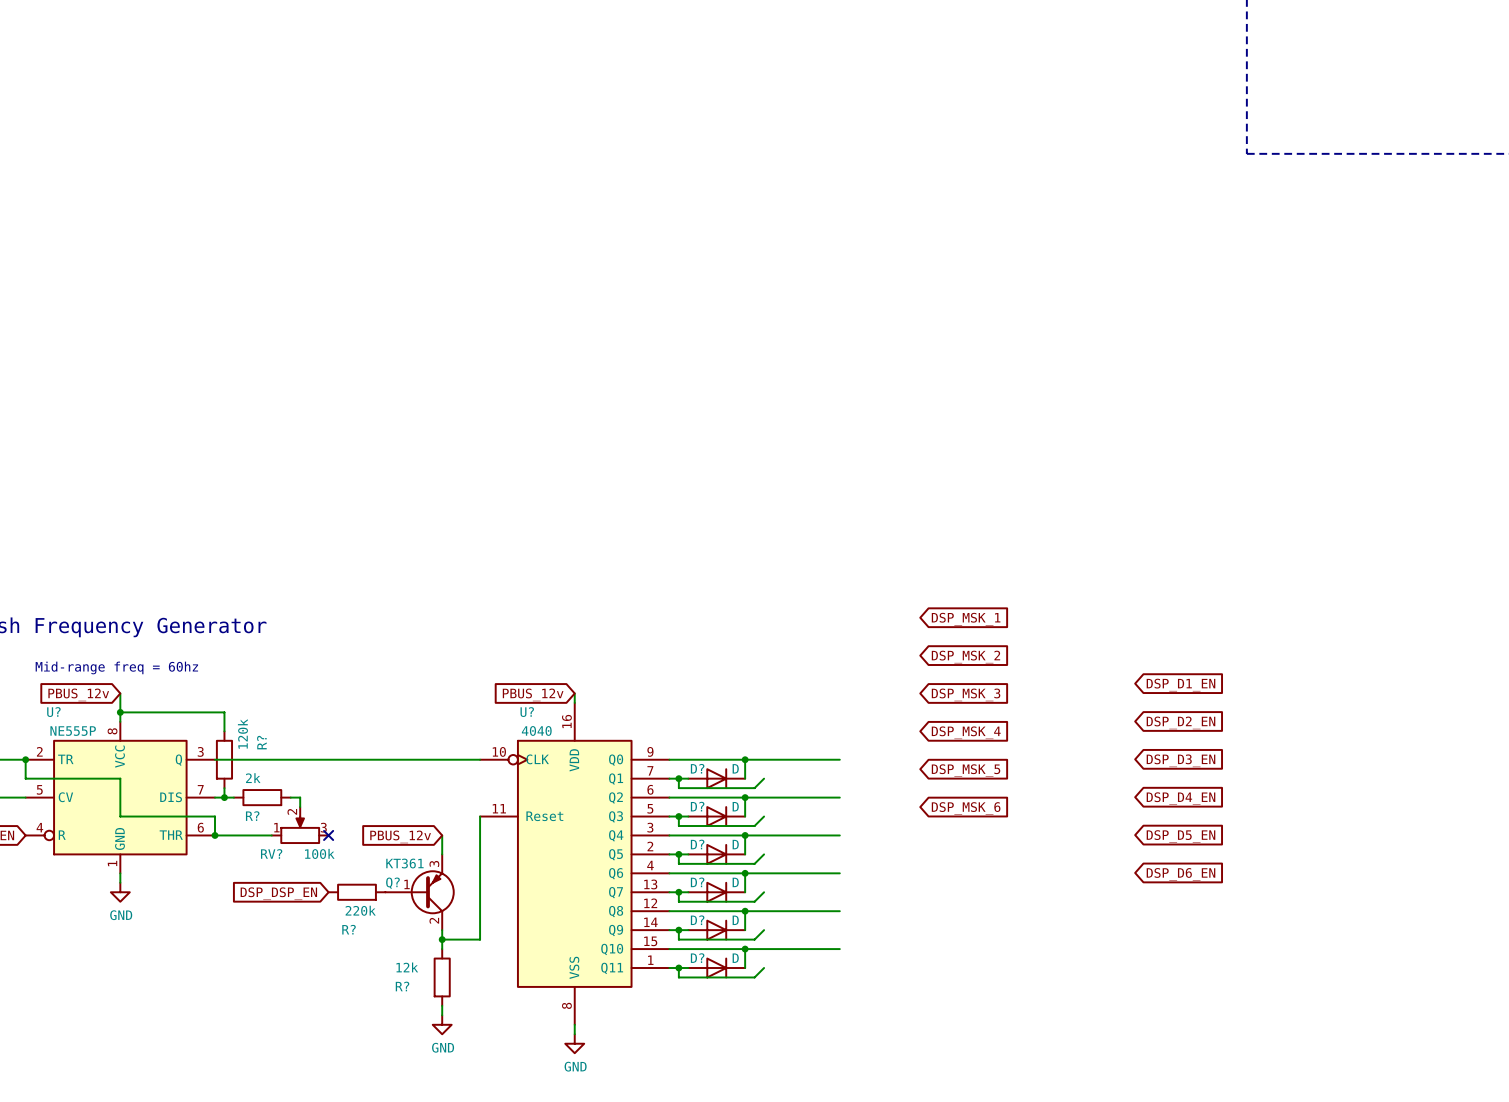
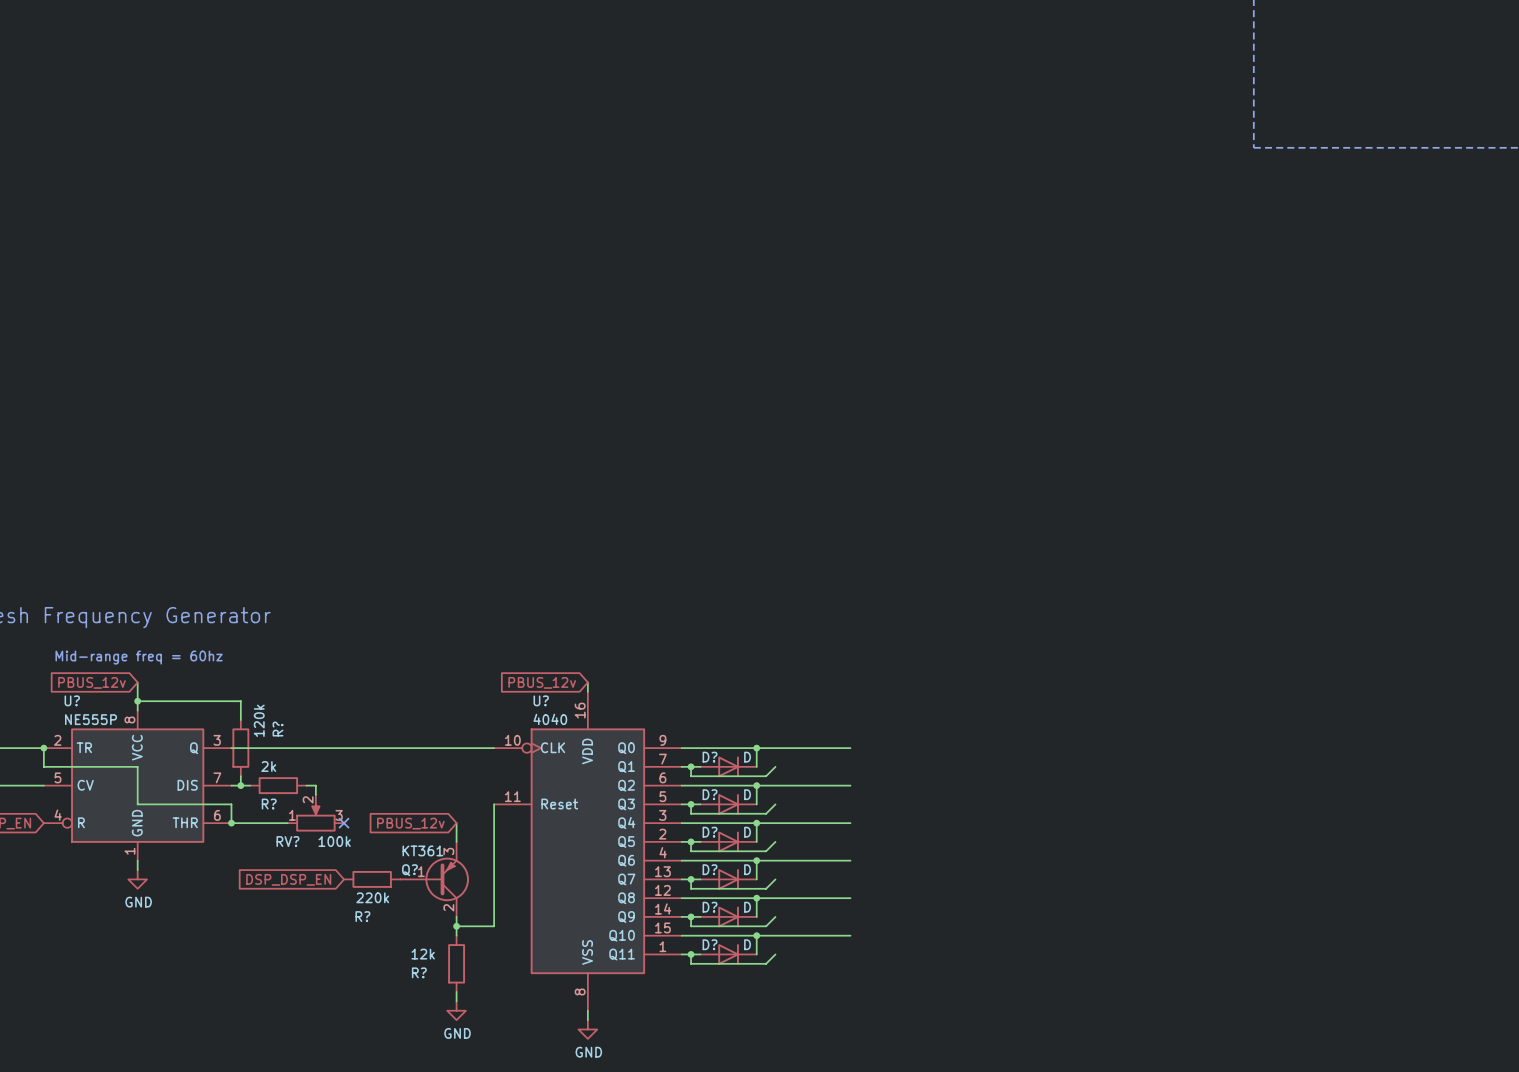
global label: DSP_MSK_1 (966, 619) -> none
global label: DSP_MSK_2 (965, 657) -> none
global label: DSP_D1_EN (1180, 685) -> none
global label: DSP_MSK_3 (966, 694) -> none
global label: DSP_D2_EN (1180, 722) -> none
global label: DSP_MSK_4 (966, 732) -> none
global label: DSP_D3_EN (1180, 760) -> none
global label: DSP_MSK_5 (966, 770) -> none
global label: DSP_D4_EN (1180, 798) -> none
global label: DSP_MSK_6 (966, 808) -> none
global label: DSP_D5_EN (1180, 836) -> none
global label: DSP_D6_EN (1180, 874) -> none

